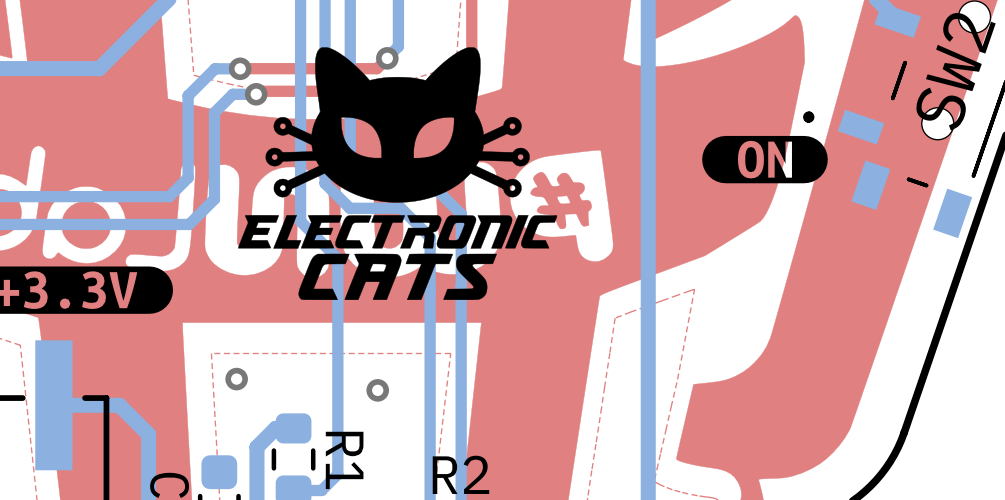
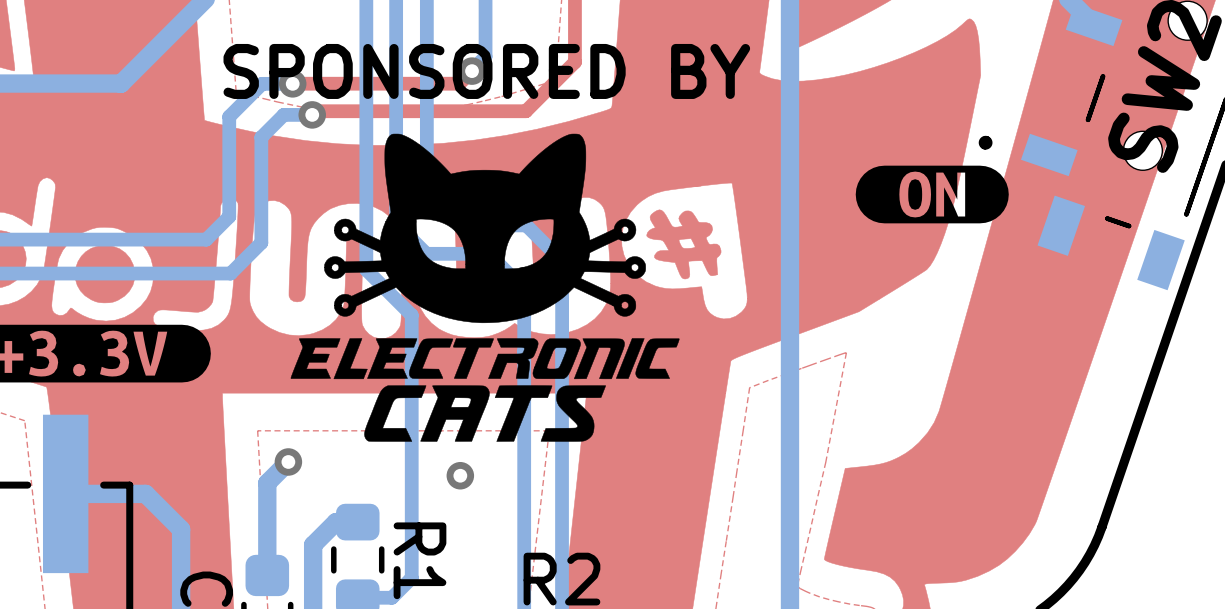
text: none -> SPONSORED BY (486, 71)
drawing position: (397, 173) -> (485, 287)
bottom track: none -> (288, 461) (267, 483) (267, 575)

